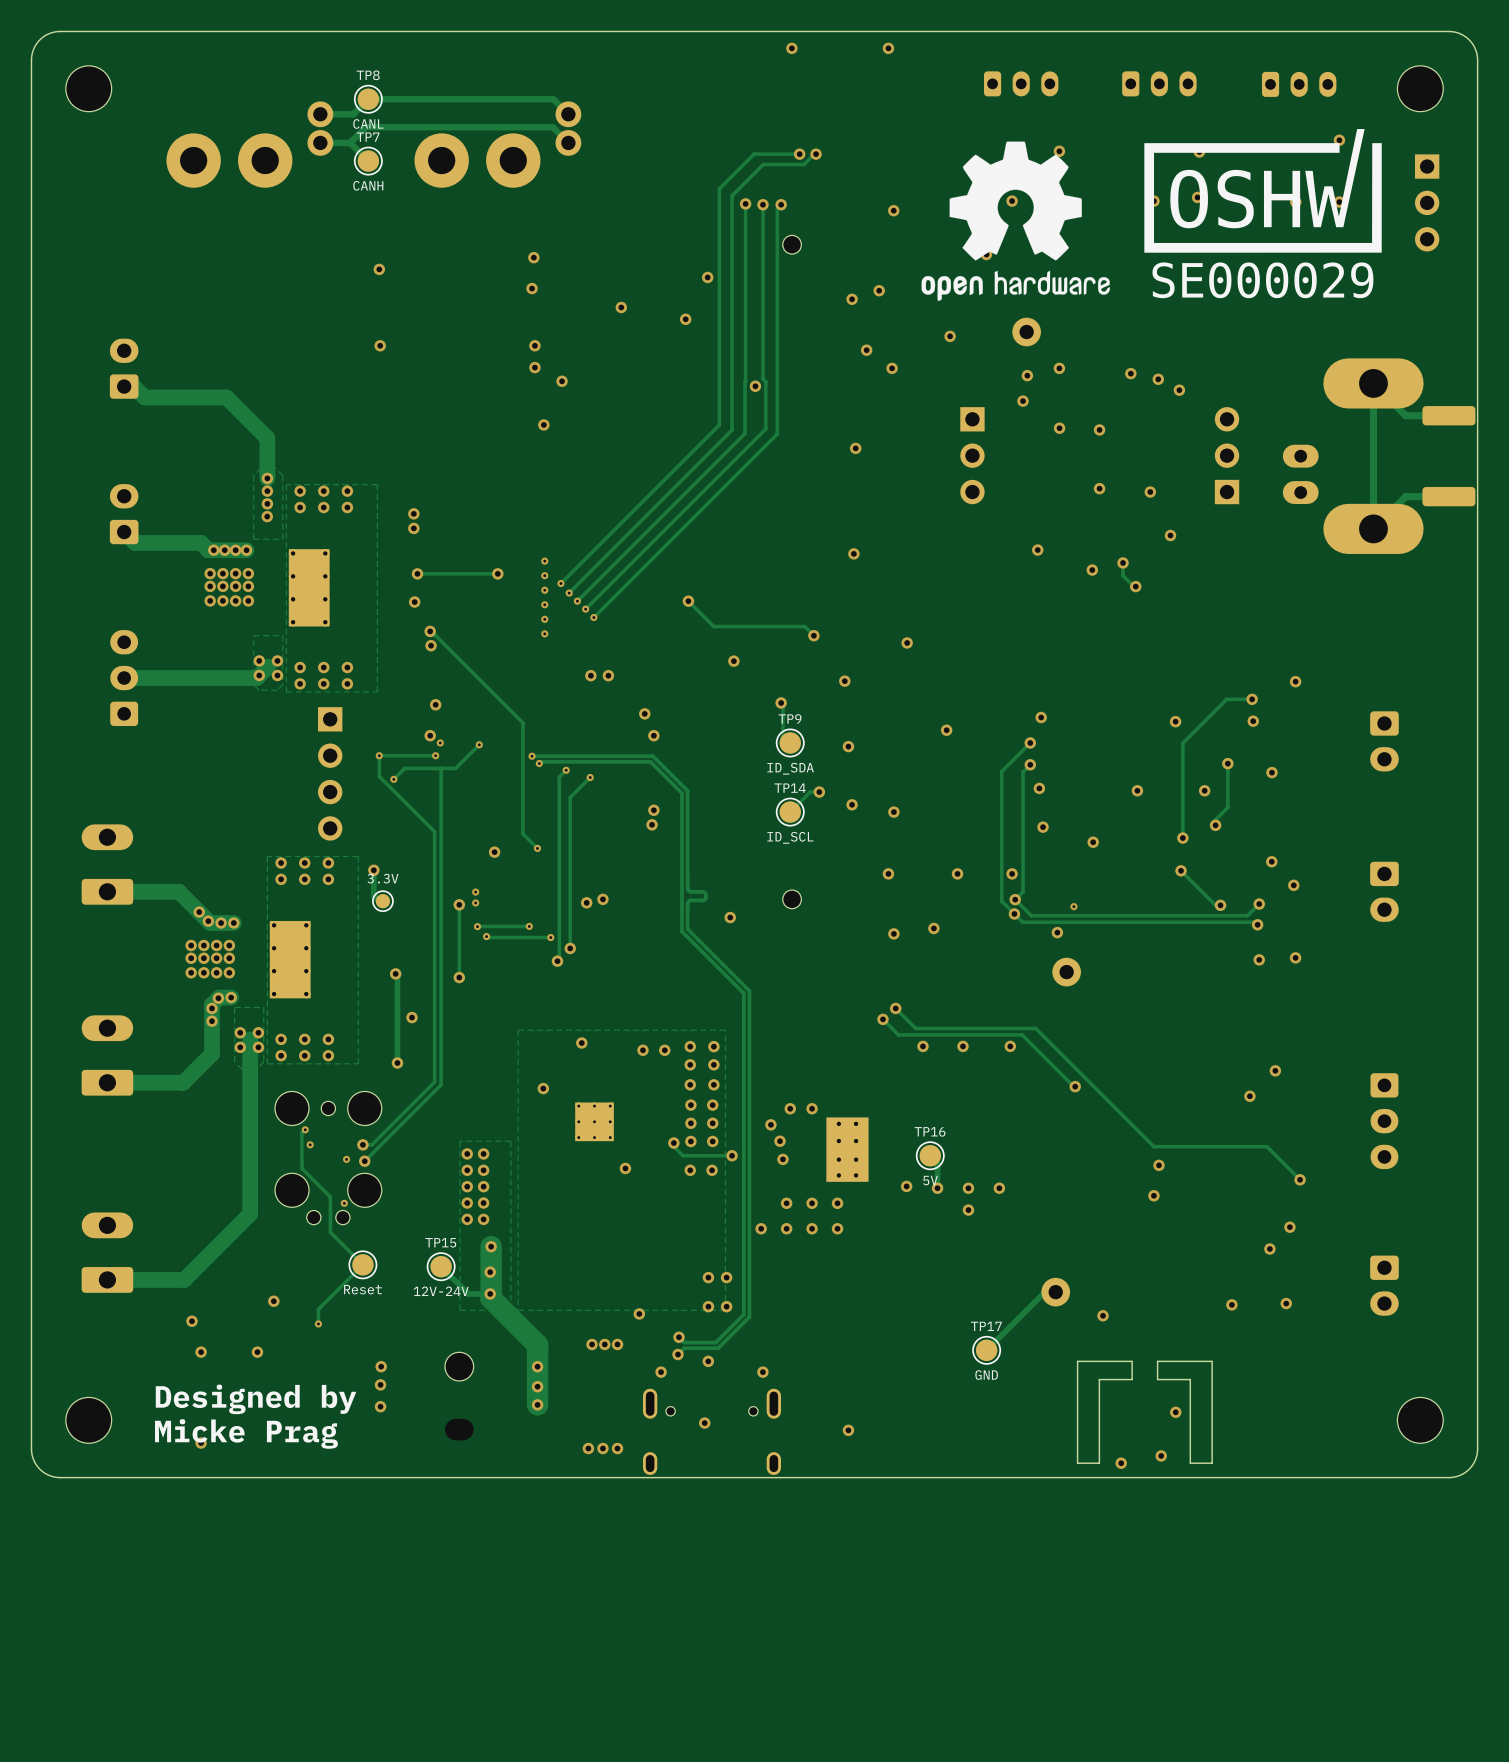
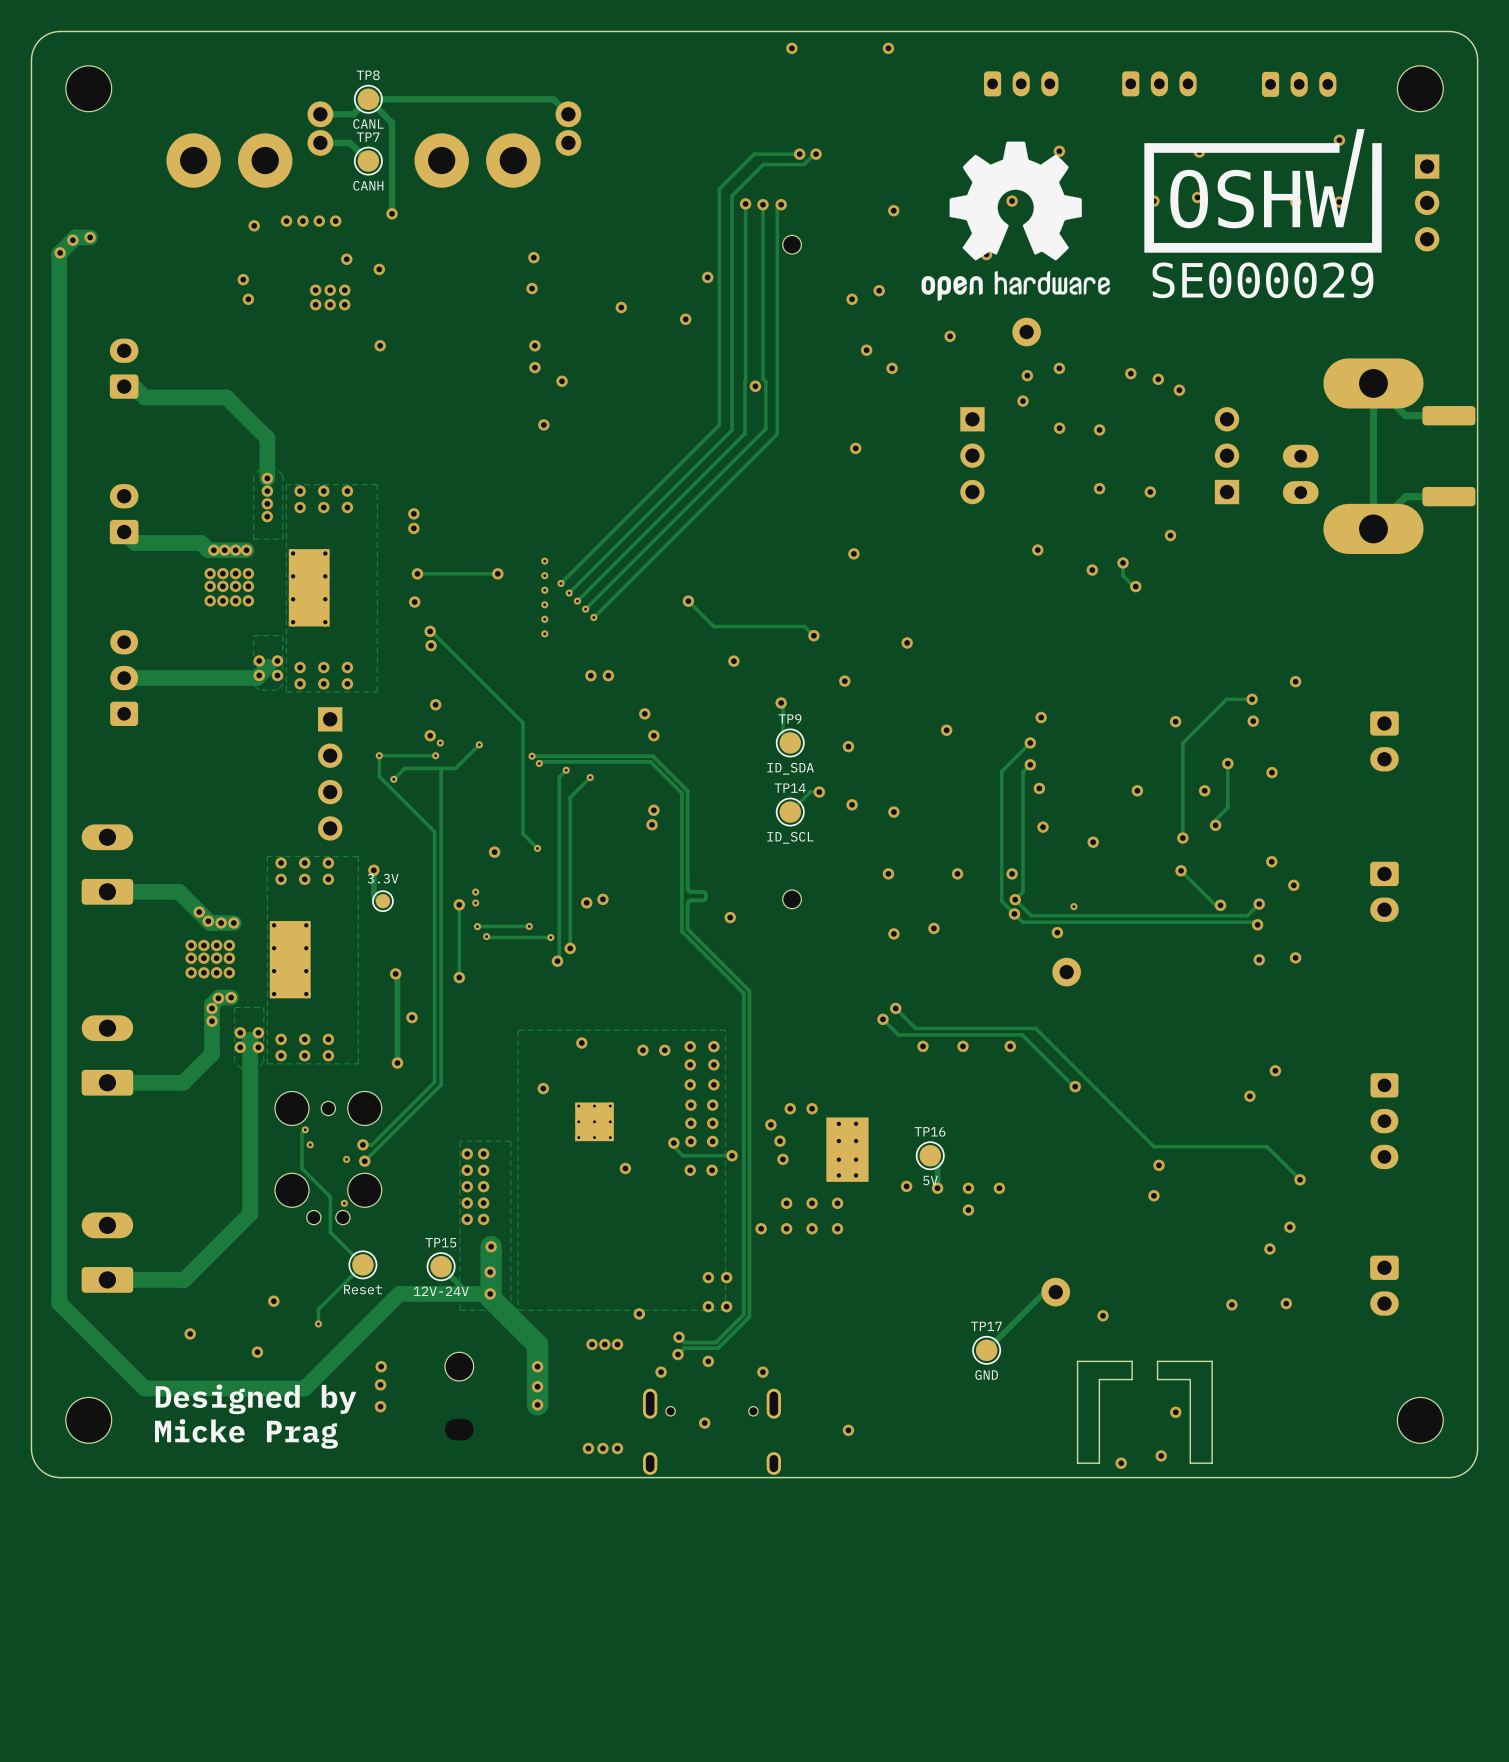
track: none -> (368, 99) (392, 122) (392, 213)
track: (568, 142) (552, 127) (365, 127) (350, 142) -> none
via: none -> (392, 213)
via: none -> (286, 221)
via: none -> (302, 221)
via: none -> (319, 221)
via: none -> (335, 221)
via: none -> (254, 225)
track: none -> (90, 237) (75, 237) (59, 253) (59, 1303) (144, 1388) (304, 1388) (399, 1293) (490, 1293)
via: none -> (90, 237)
via: none -> (72, 240)
via: none -> (60, 252)
via: none -> (346, 259)
via: none -> (243, 279)
via: none -> (315, 290)
via: none -> (330, 290)
via: none -> (344, 290)
via: none -> (248, 299)
via: none -> (315, 304)
via: none -> (330, 304)
via: none -> (344, 304)
via: (192, 1321) -> none
via: none -> (190, 1333)
via: (201, 1352) -> none
via: (201, 1443) -> none

